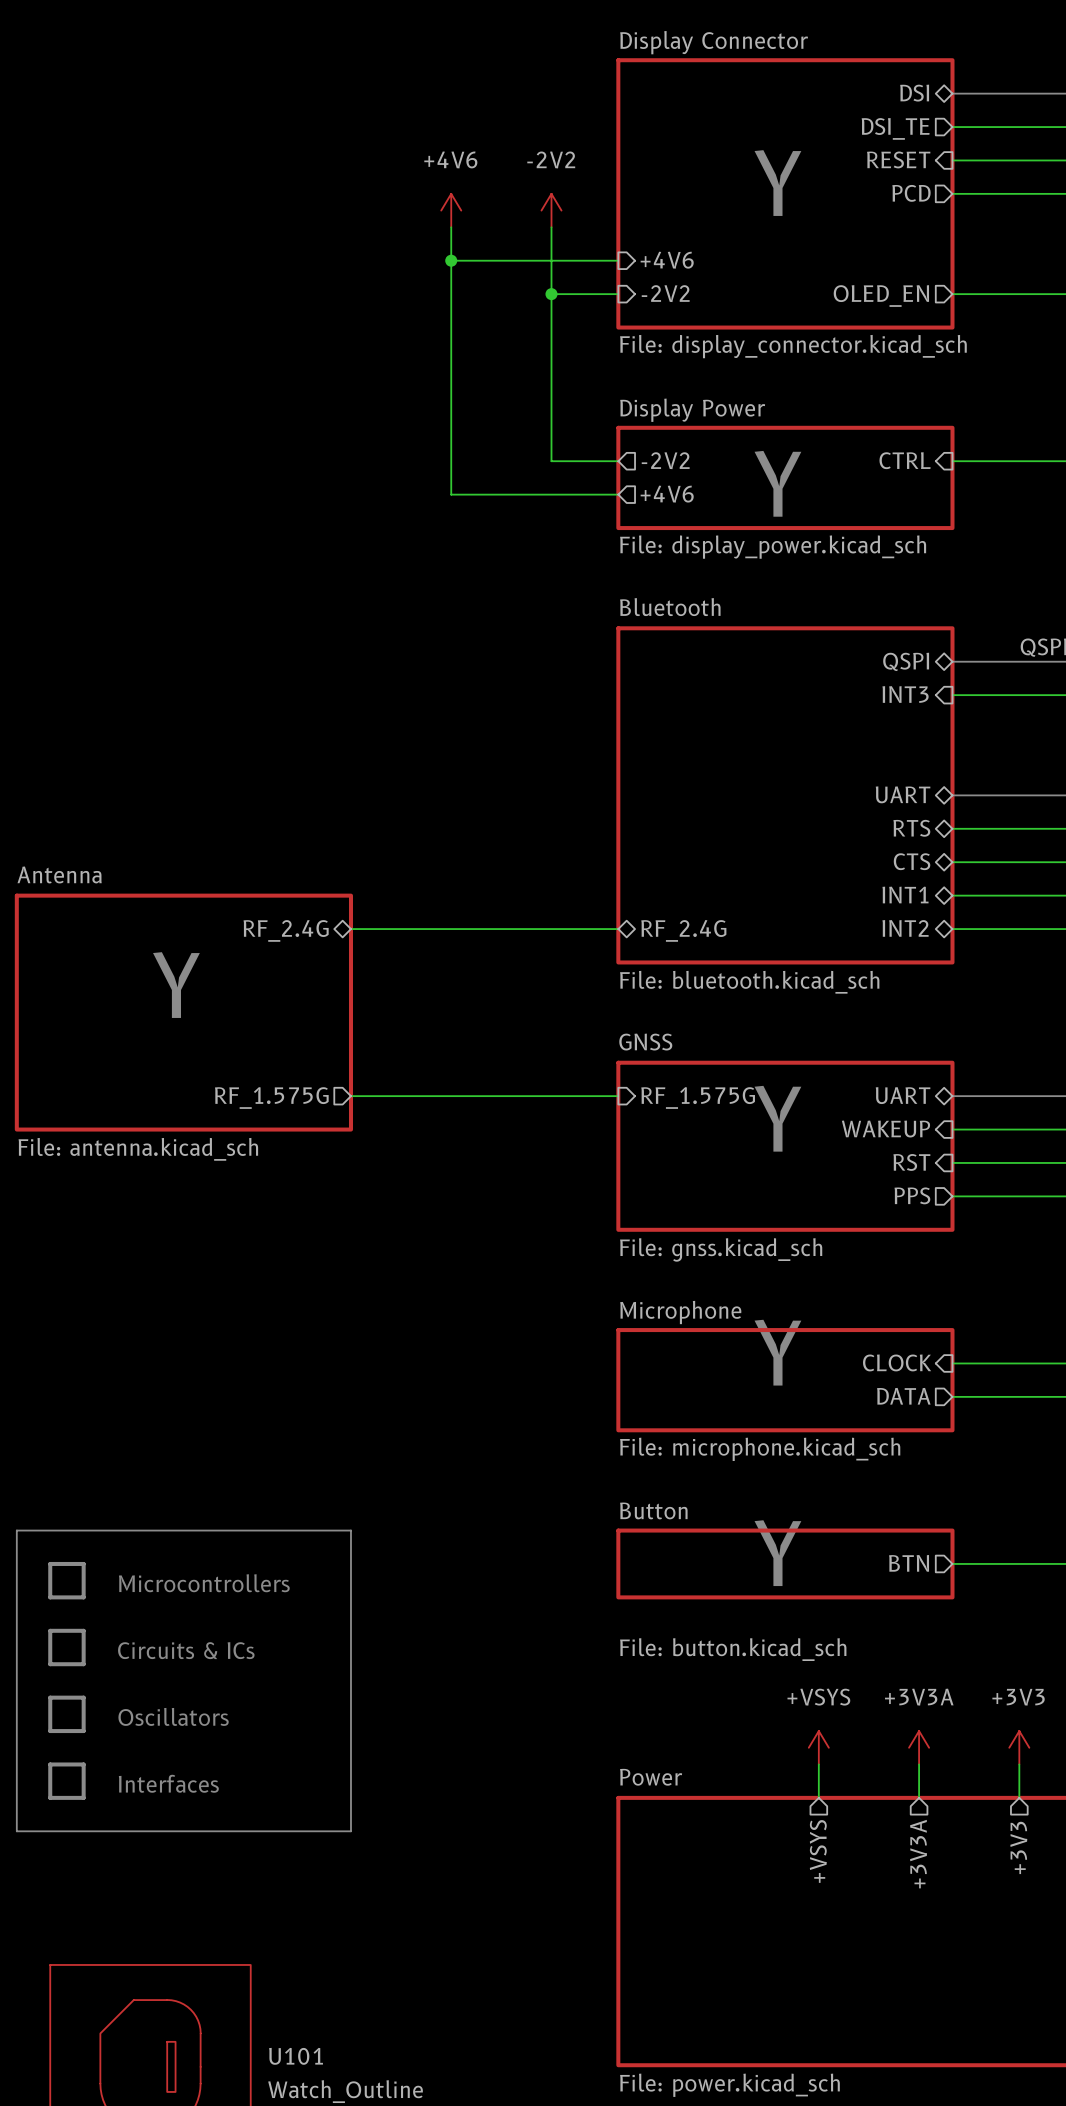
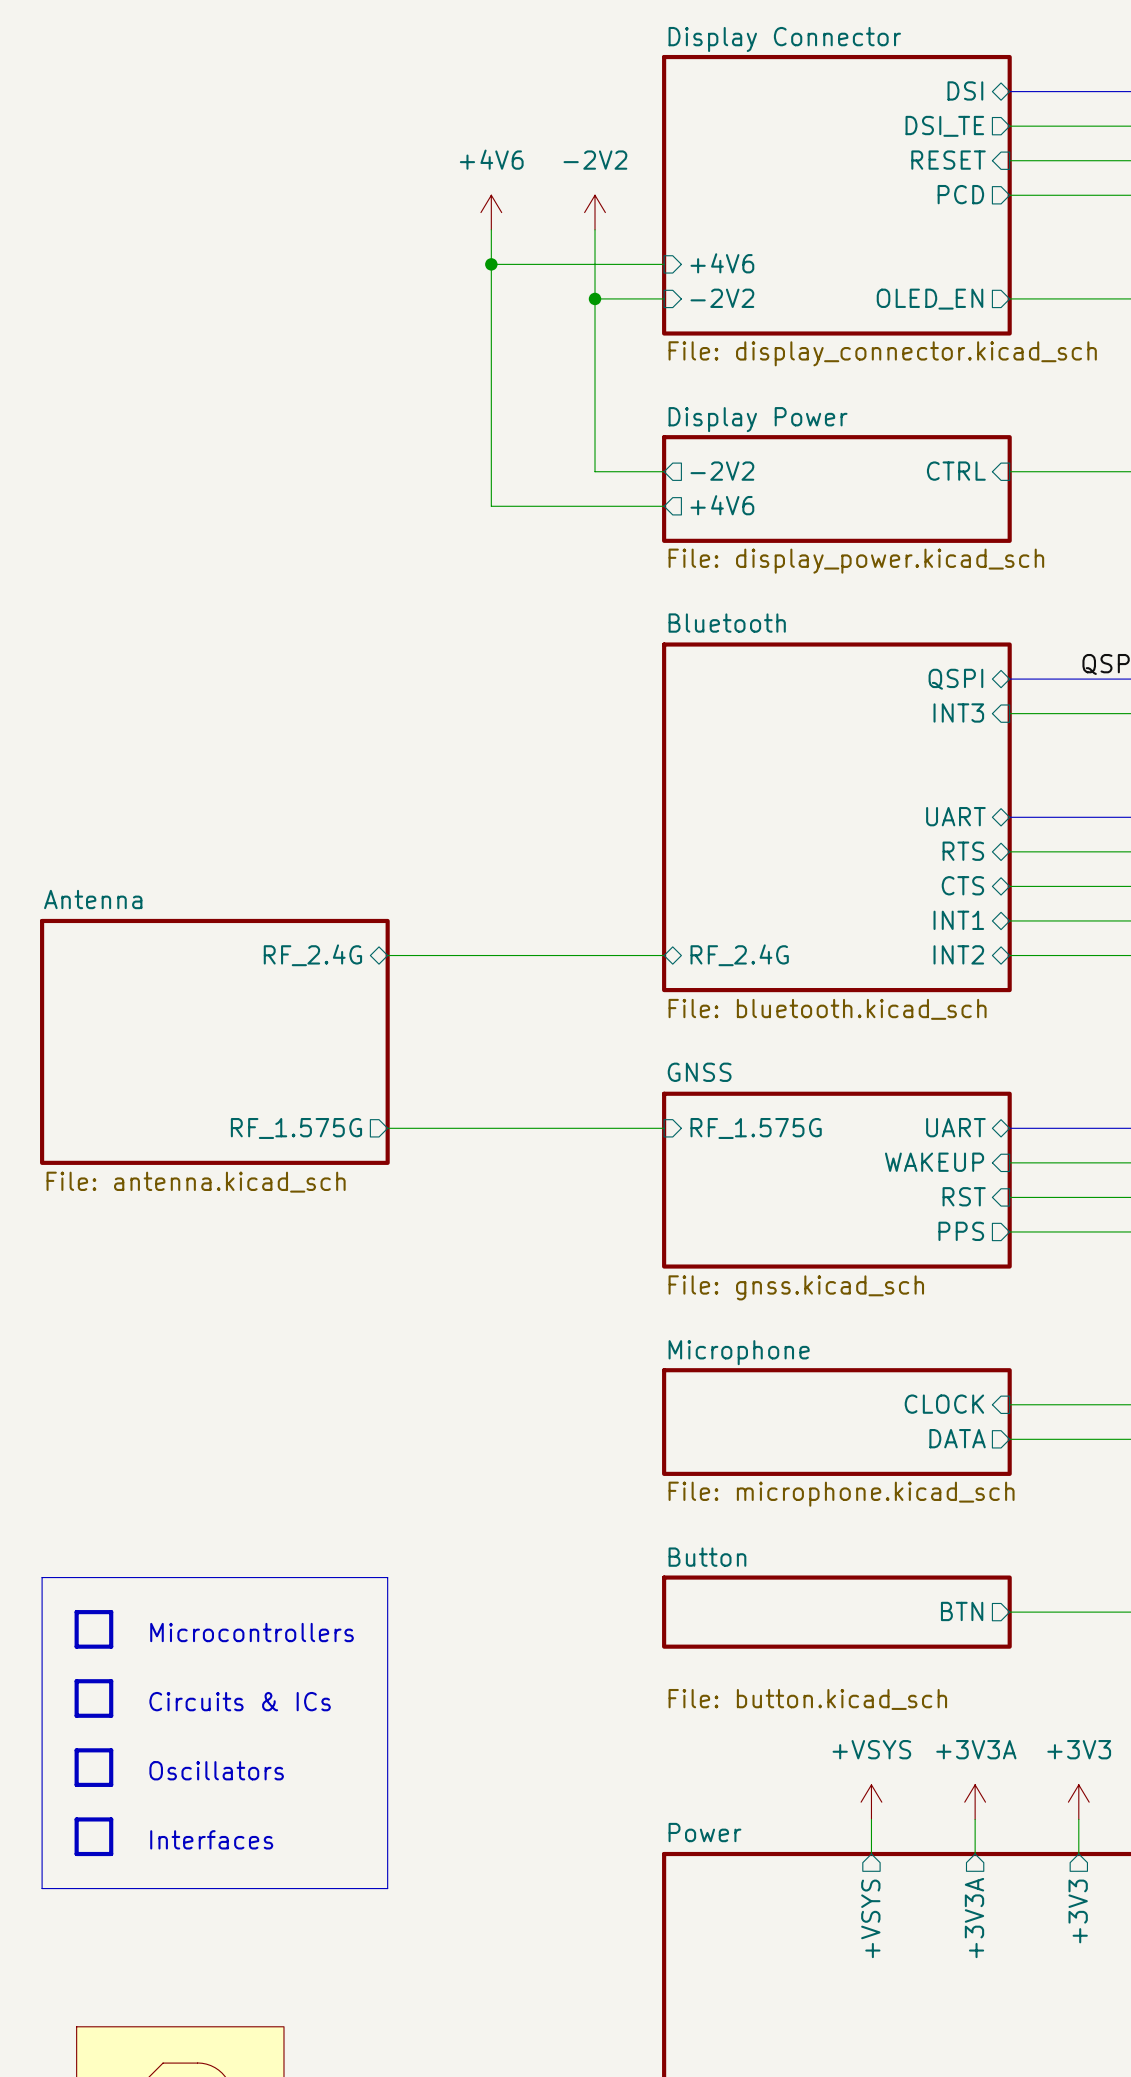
text: Y (777, 183) -> none
text: Y (777, 483) -> none
text: Y (176, 985) -> none
text: Y (777, 1118) -> none
text: Y (777, 1352) -> none
text: Y (777, 1553) -> none

